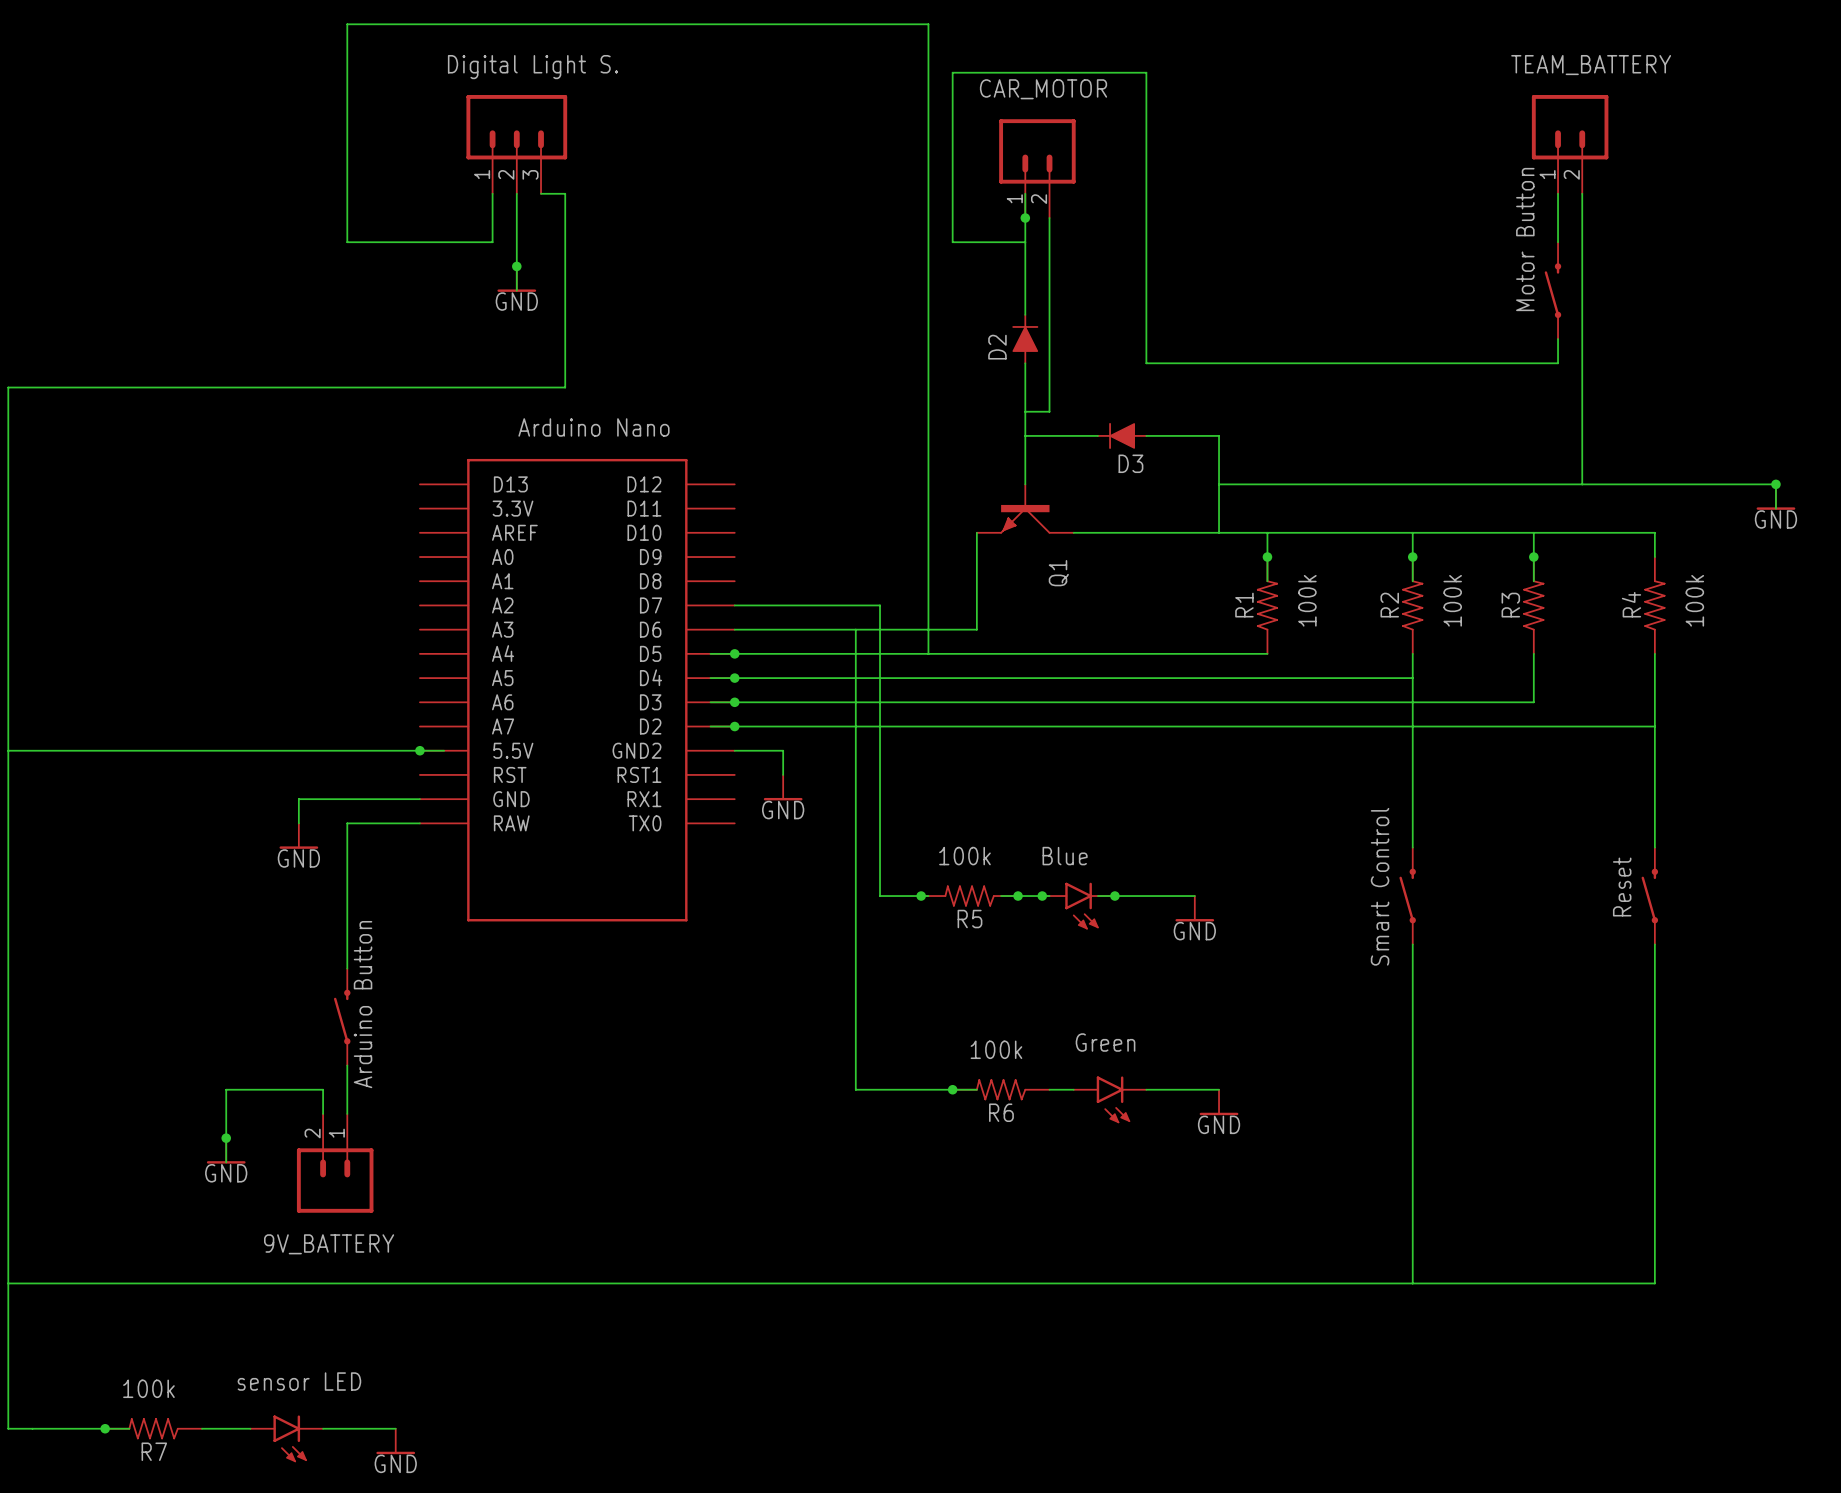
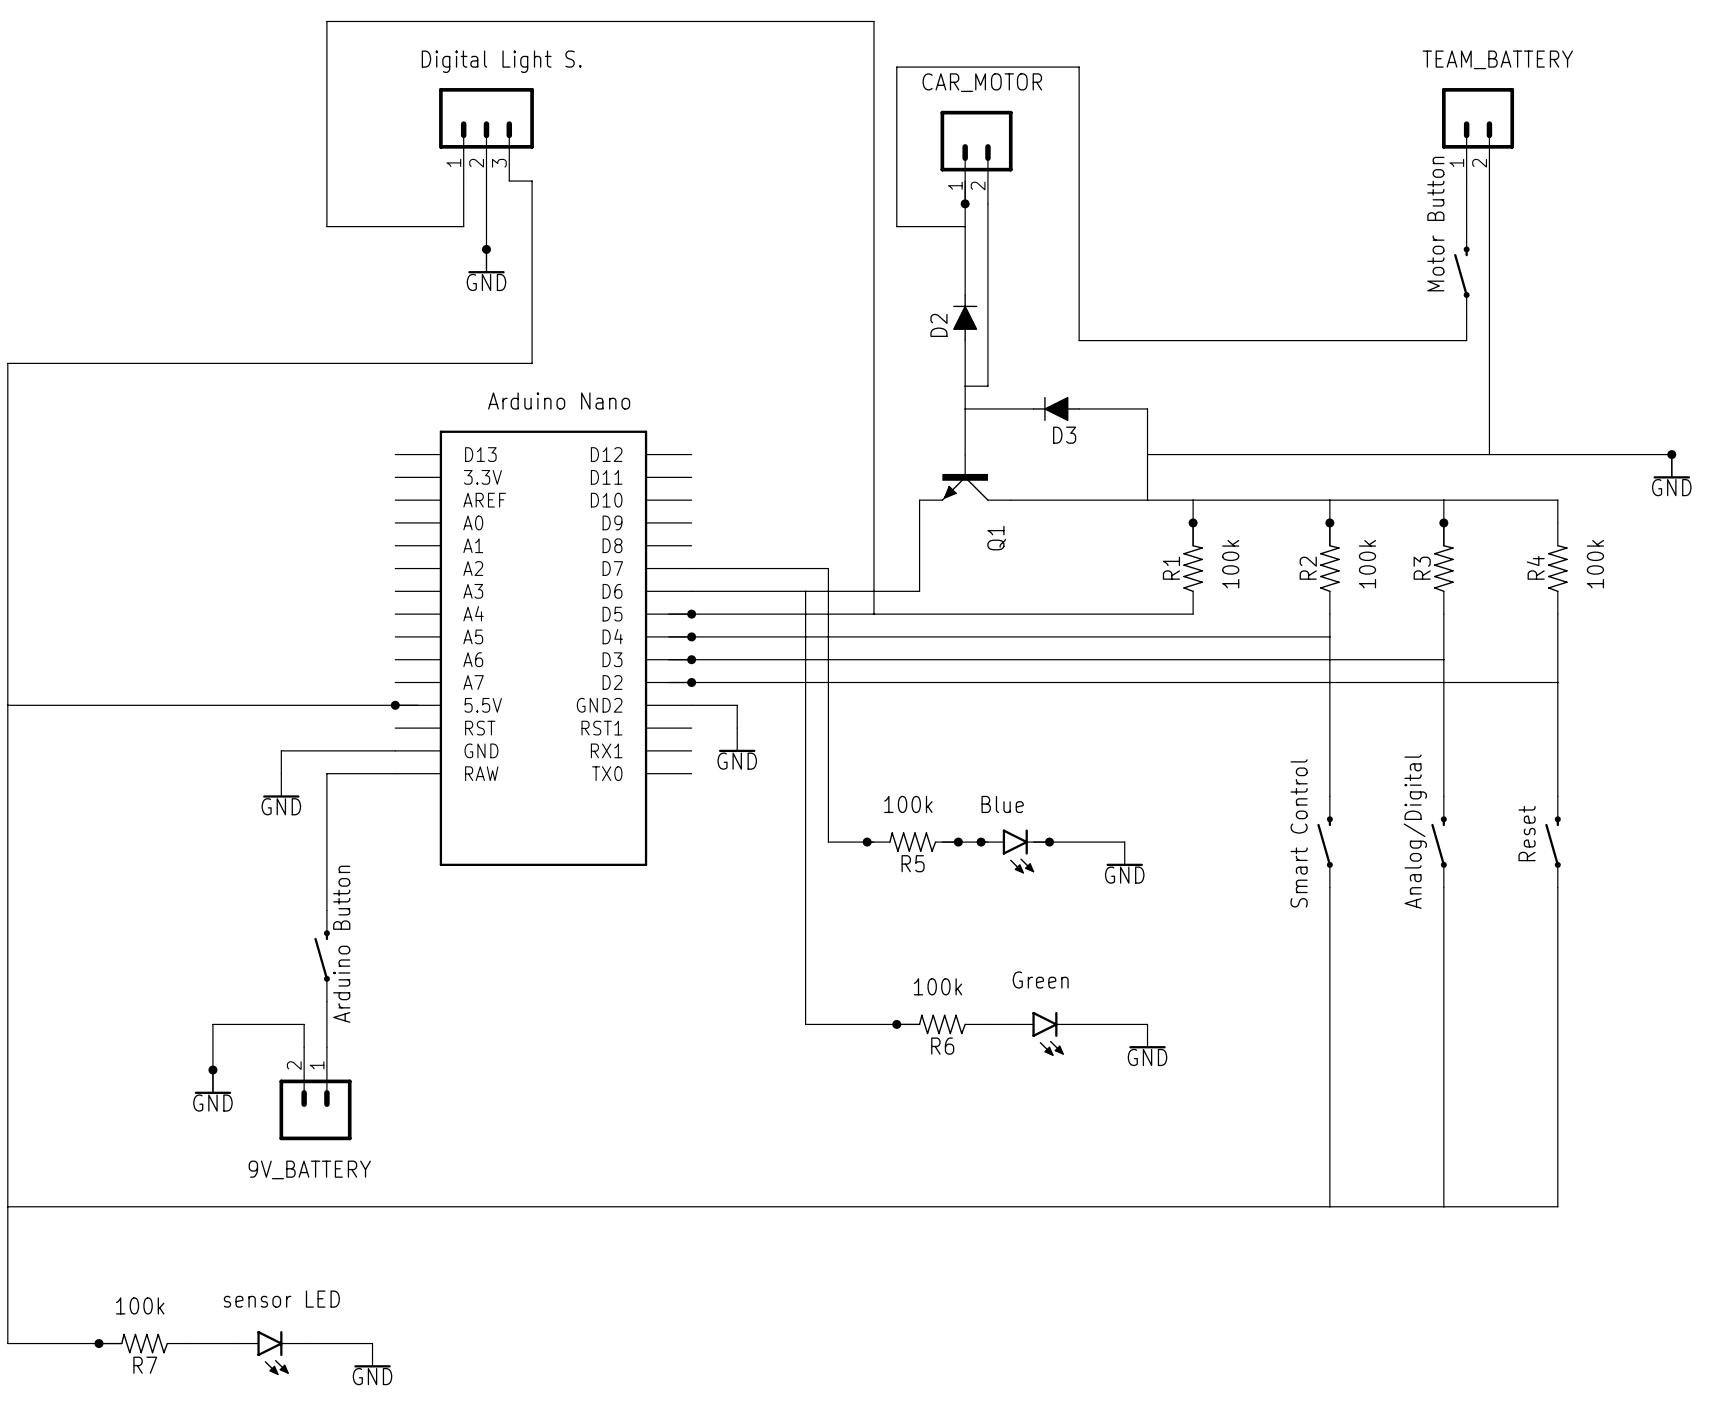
wire: none -> (1443, 659) (1443, 796)
part: none -> (1439, 842)
wire: none -> (1443, 887) (1443, 1206)

